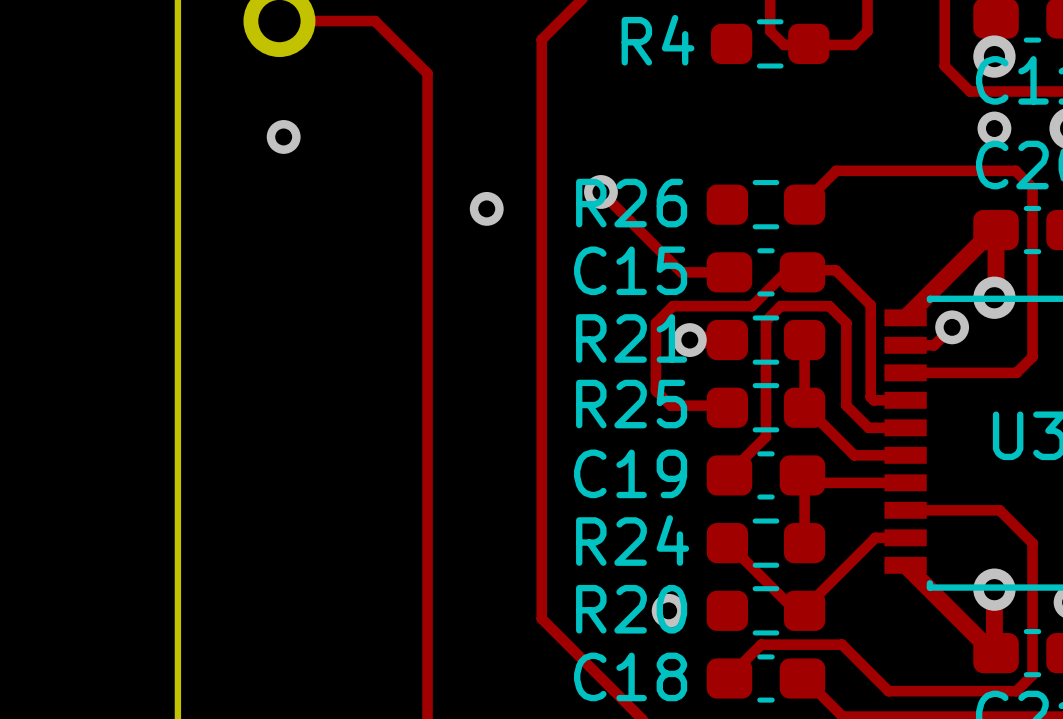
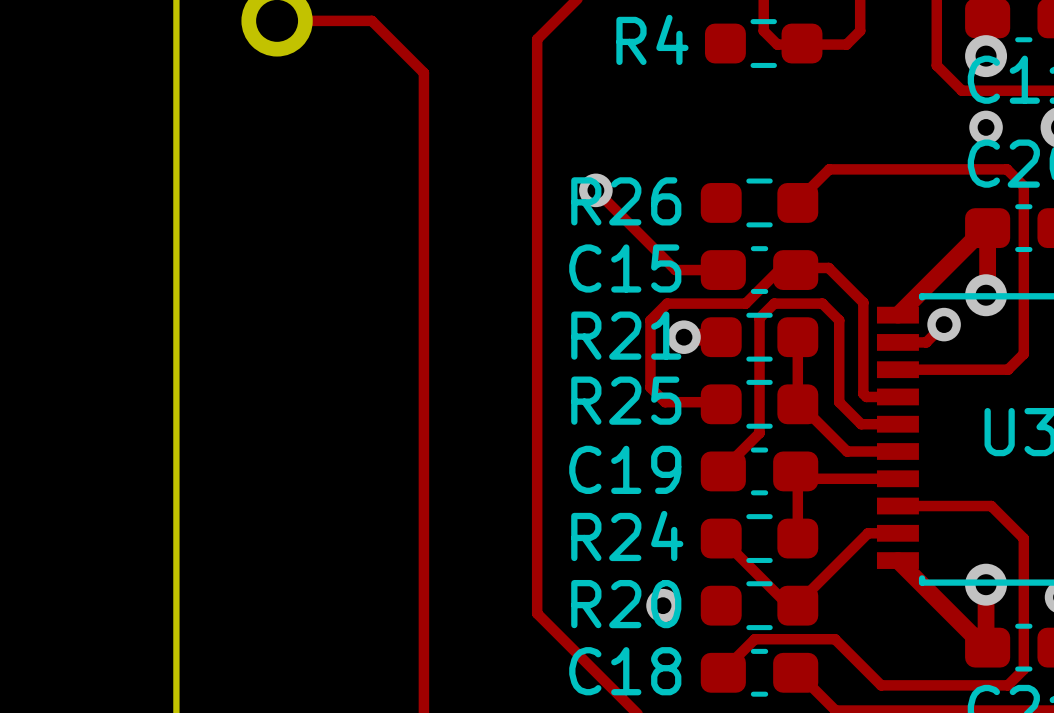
via: (283, 136) -> none
via: (486, 208) -> none

